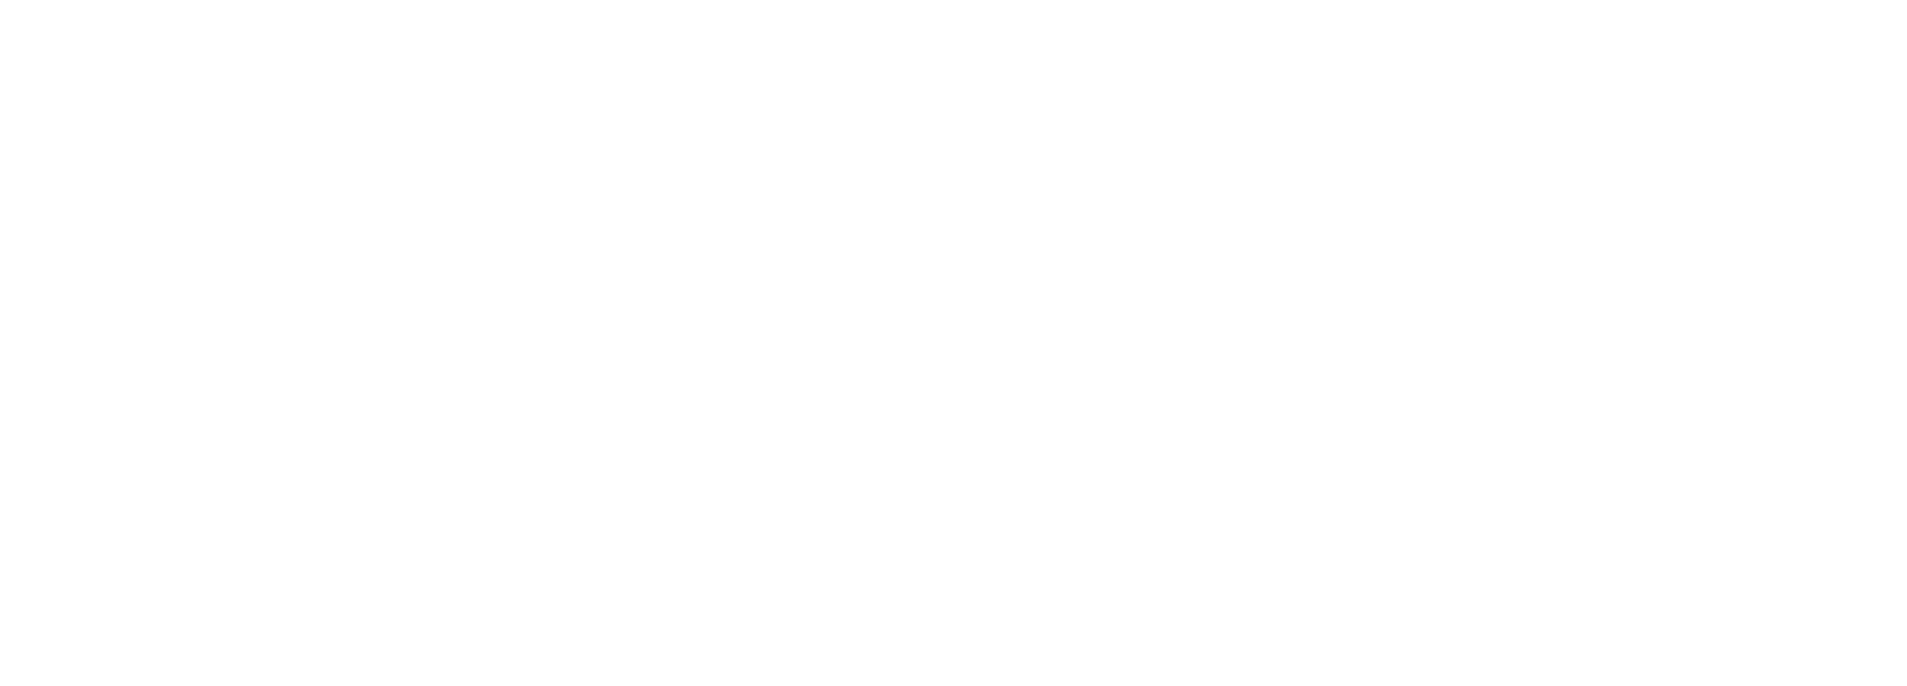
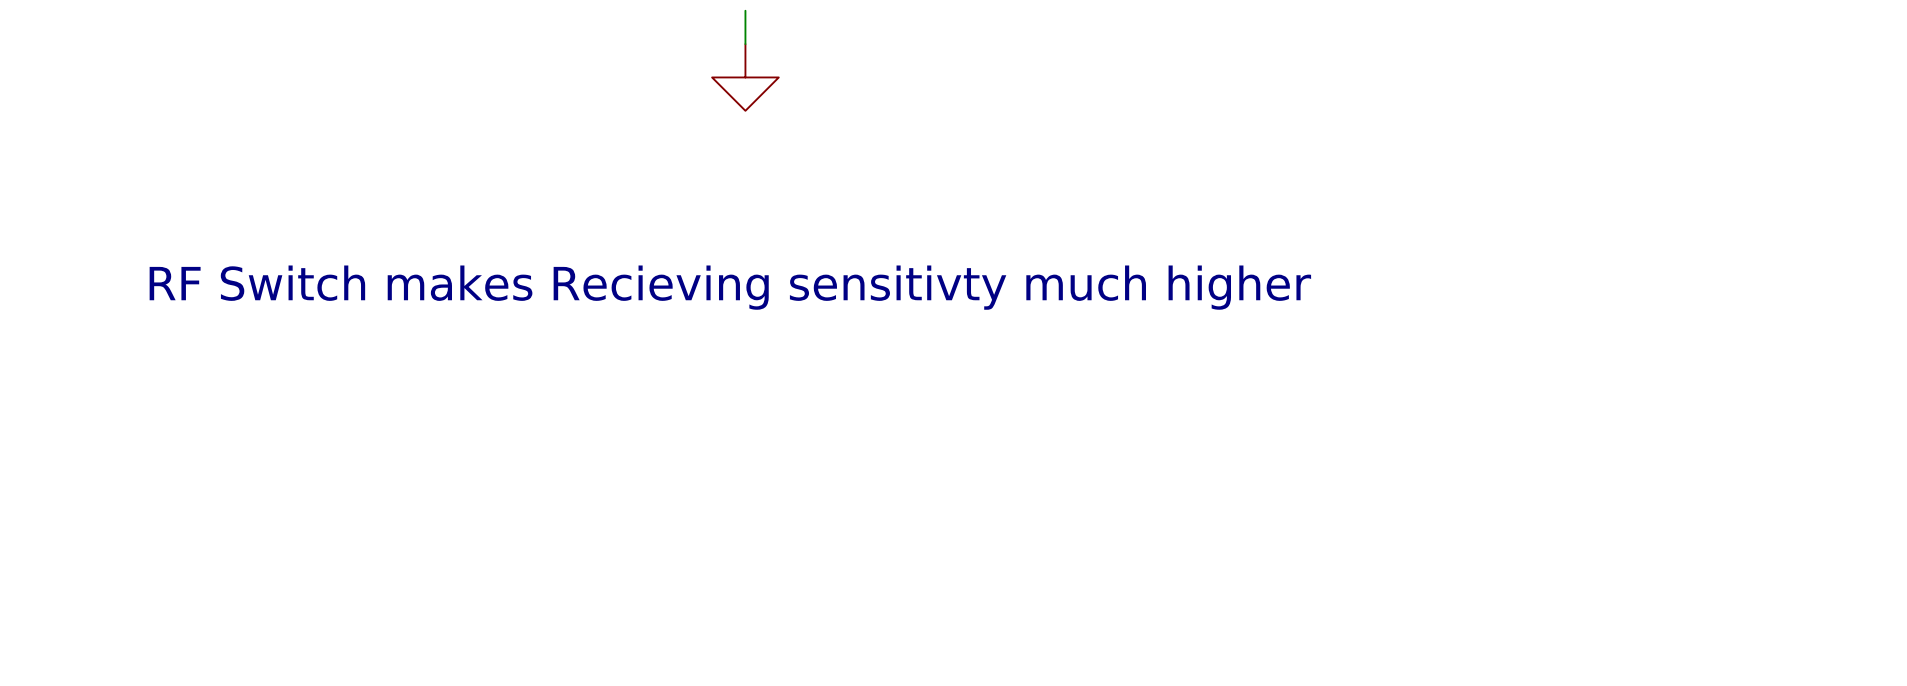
wire: none -> (745, 10) (745, 44)
power symbol: none -> (745, 77)
text: none -> RF Switch makes Recieving sensitivty much higher (730, 287)

